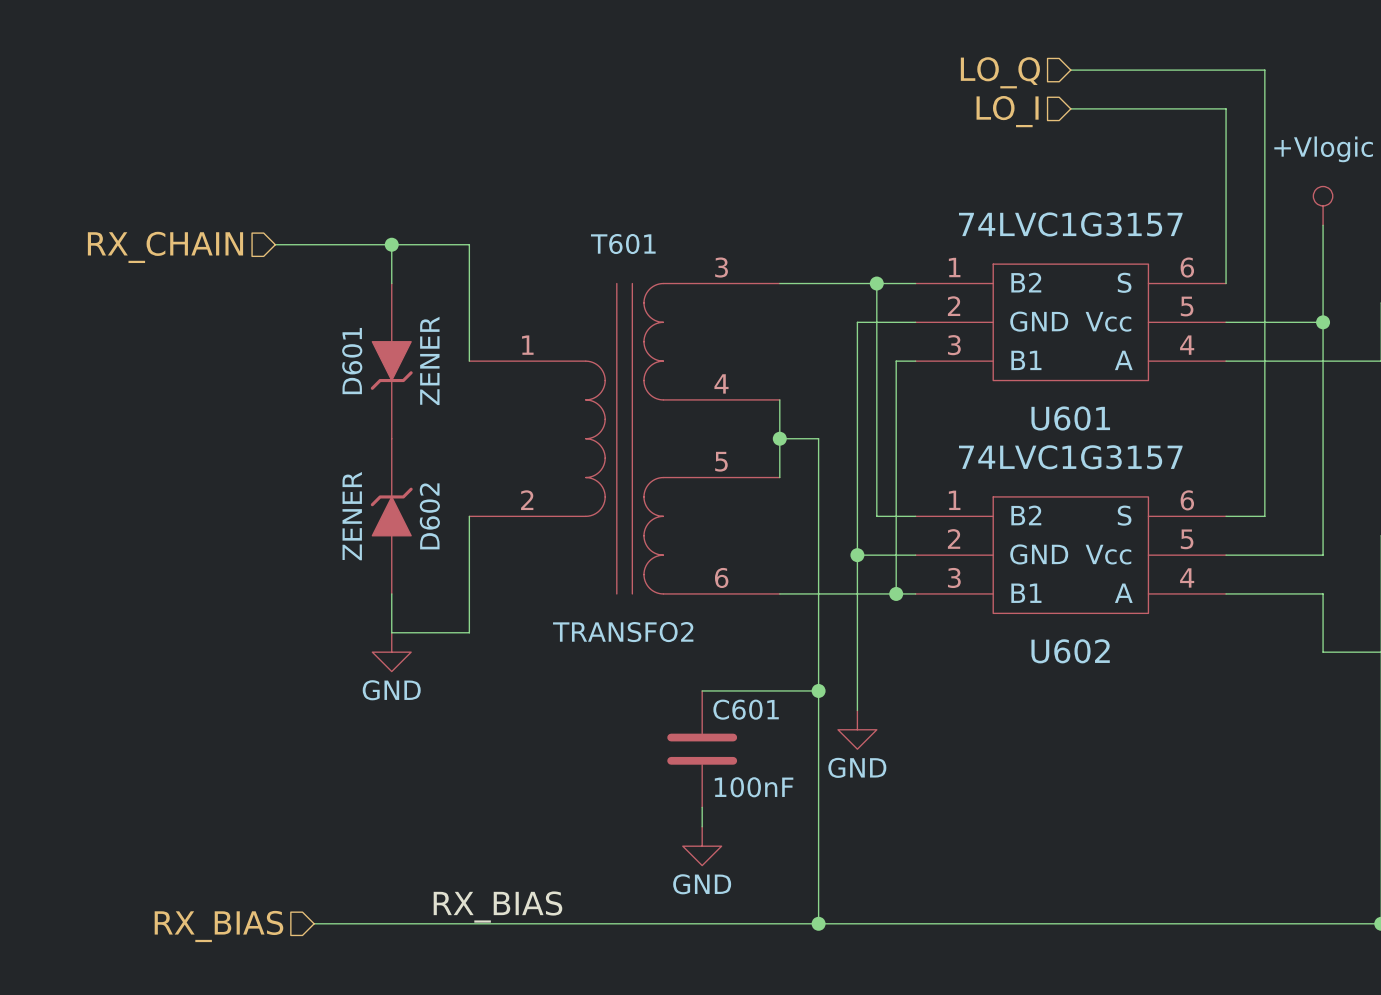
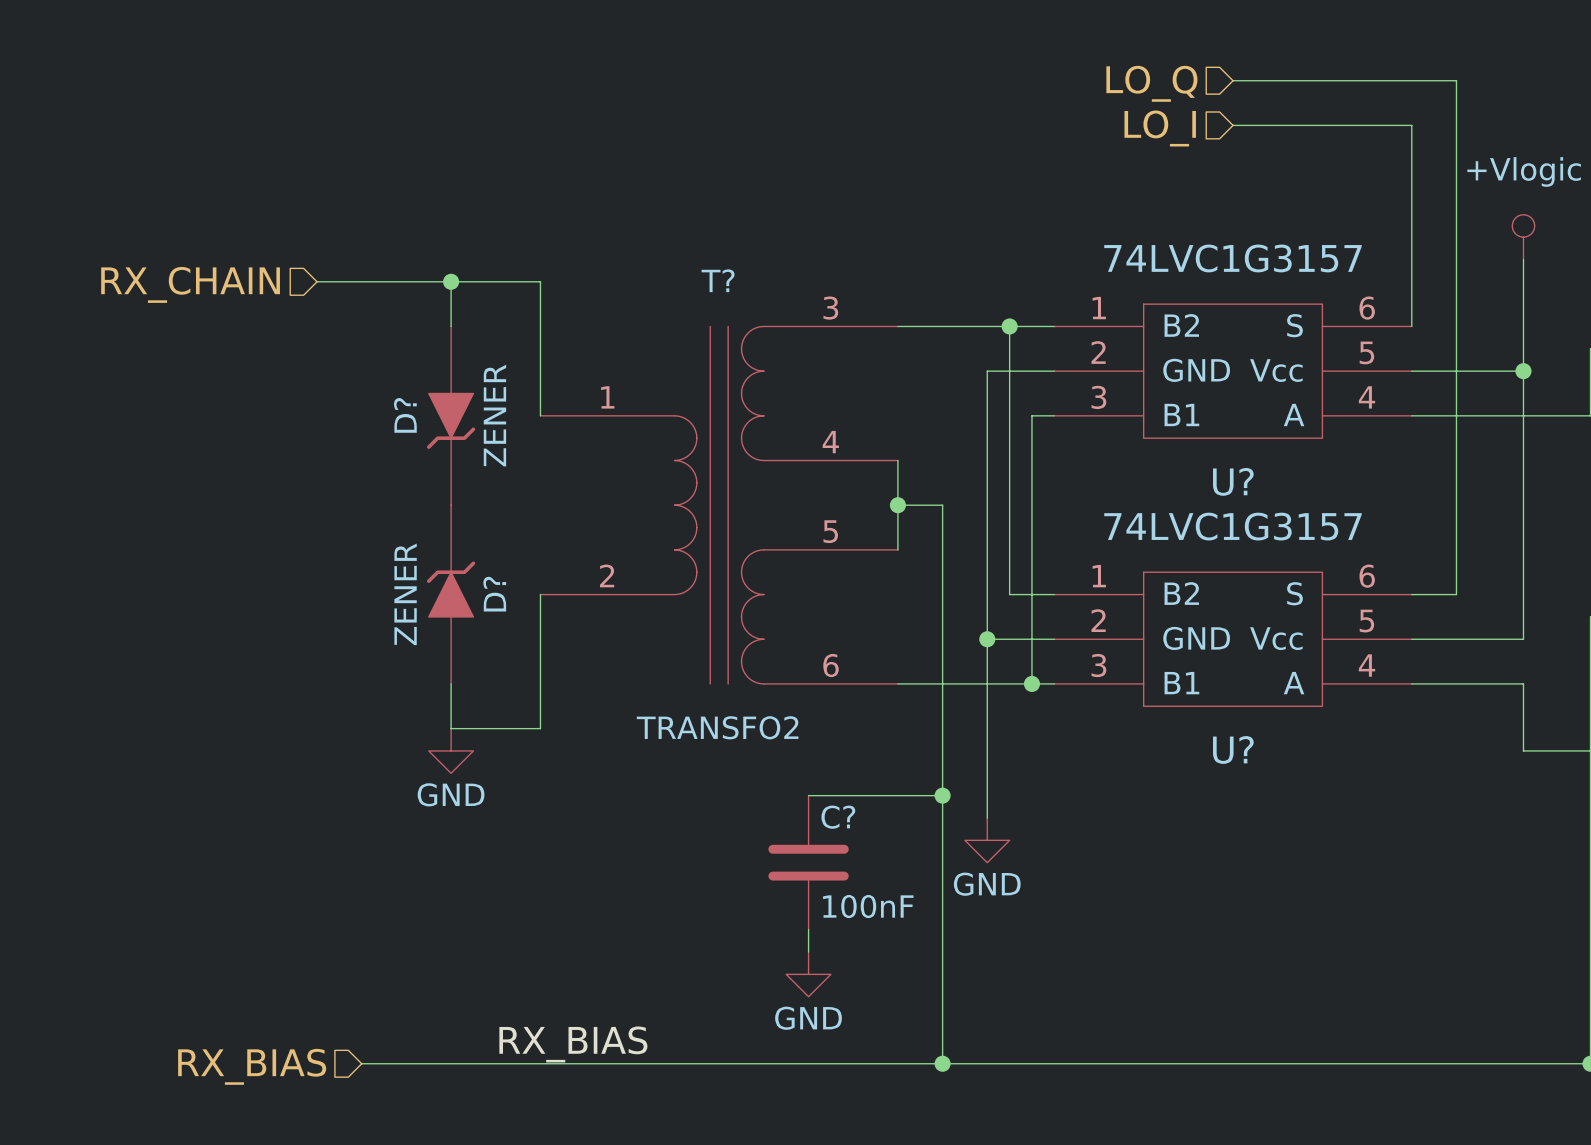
T601 name: T601 (623, 244) -> T? (718, 280)
D601 name: D601 (352, 361) -> D? (405, 415)
U601 name: U601 (1070, 418) -> U? (1233, 481)
D602 name: D602 (429, 516) -> D? (494, 594)
U602 name: U602 (1070, 651) -> U? (1233, 749)
C601 name: C601 (746, 709) -> C? (838, 817)

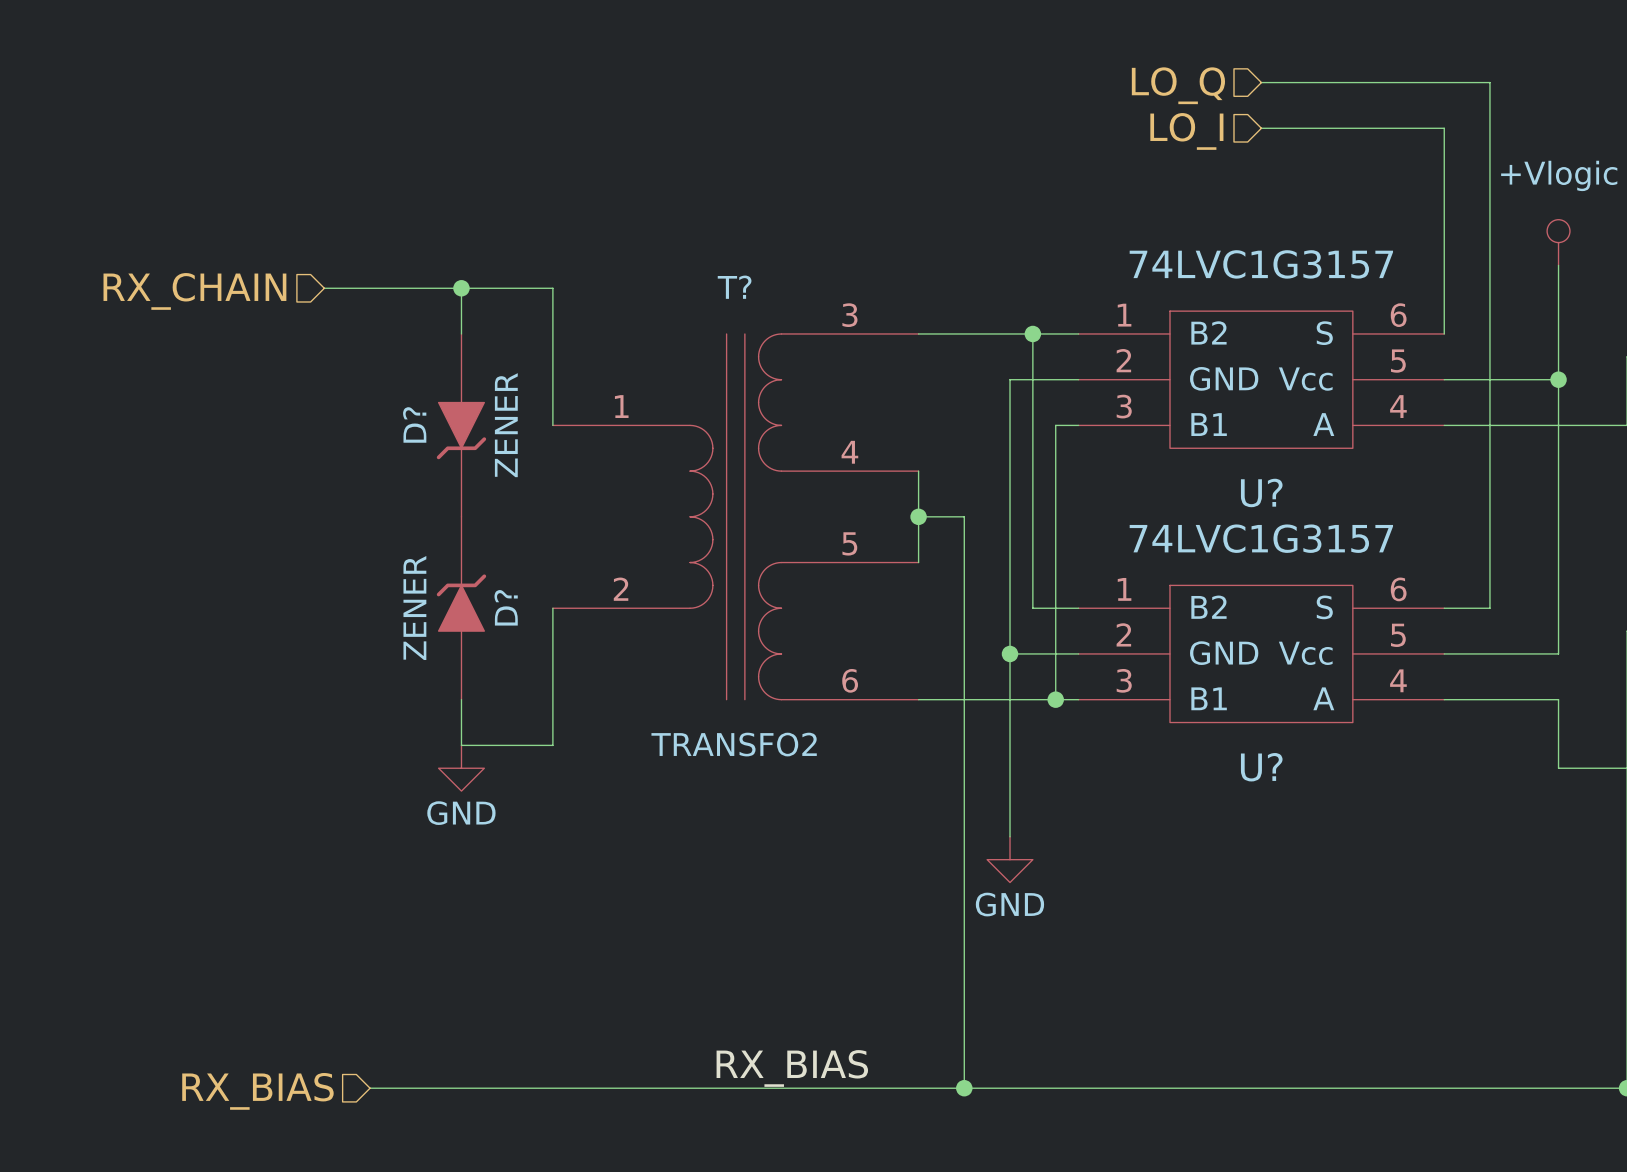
wire: (808, 795) (942, 795) -> none
junction: (942, 795) -> none
C?: 100nF (808, 862) -> none
wire: (808, 929) (808, 952) -> none
power symbol: GND (808, 974) -> none
label position: RX_BIAS (573, 1044) -> RX_BIAS (792, 1068)

